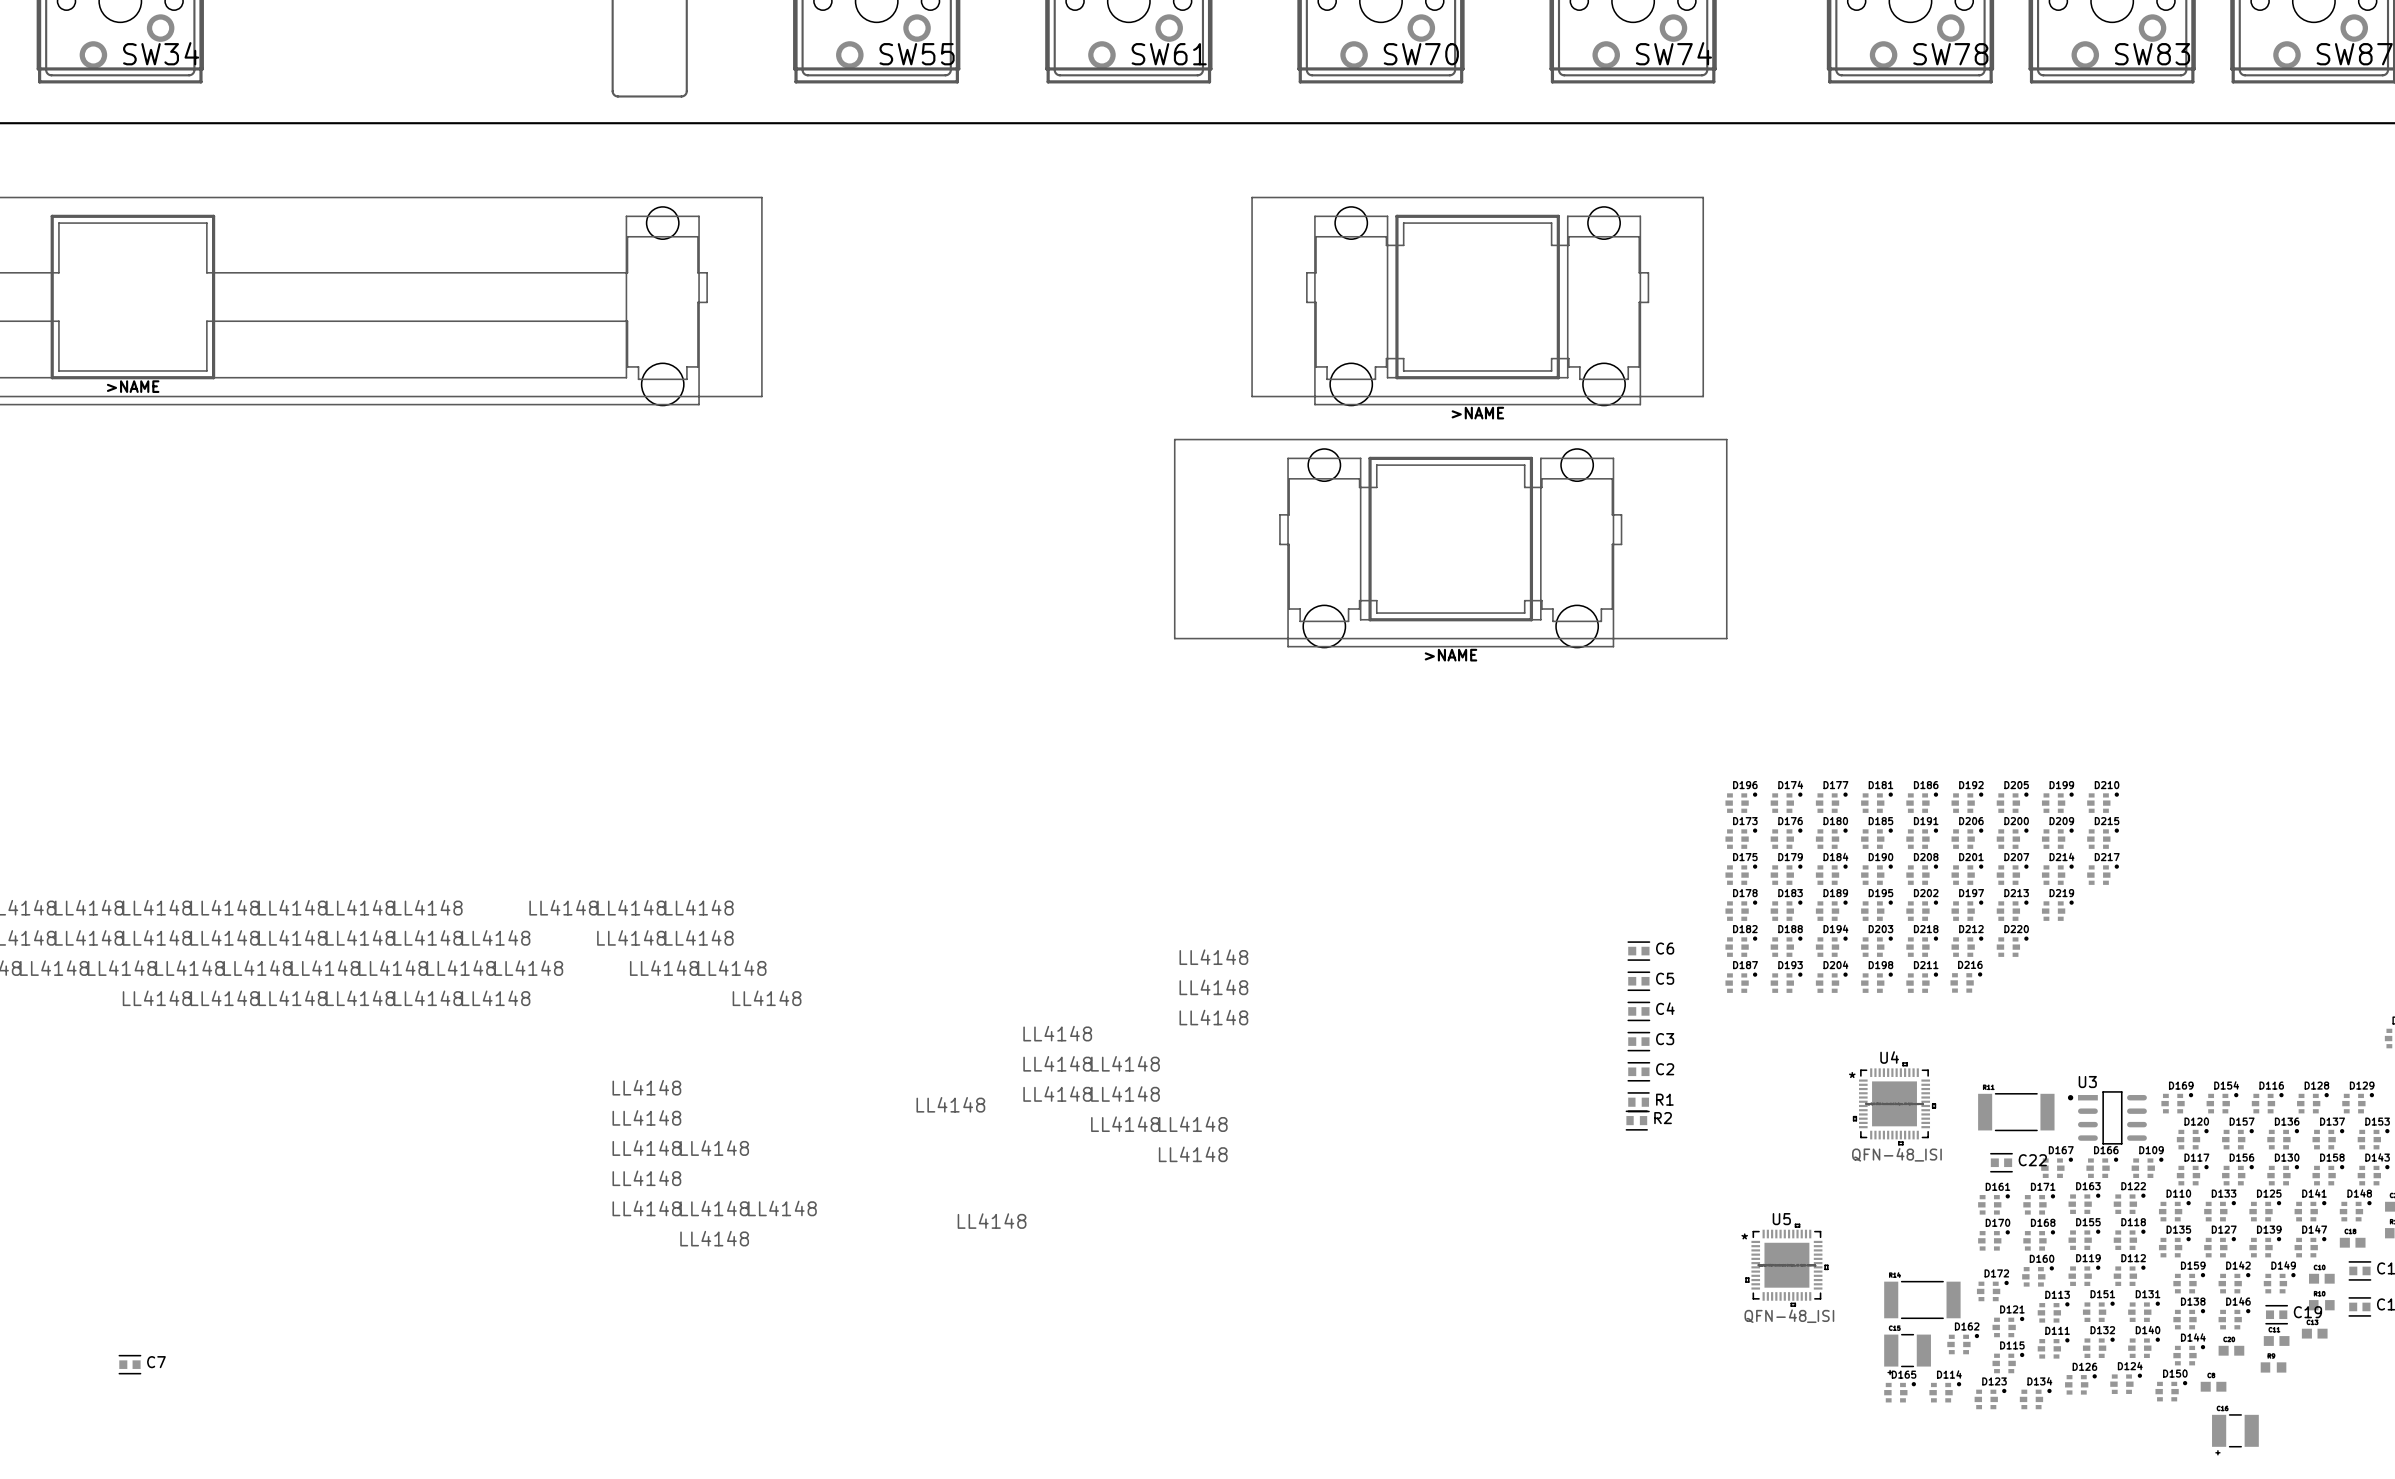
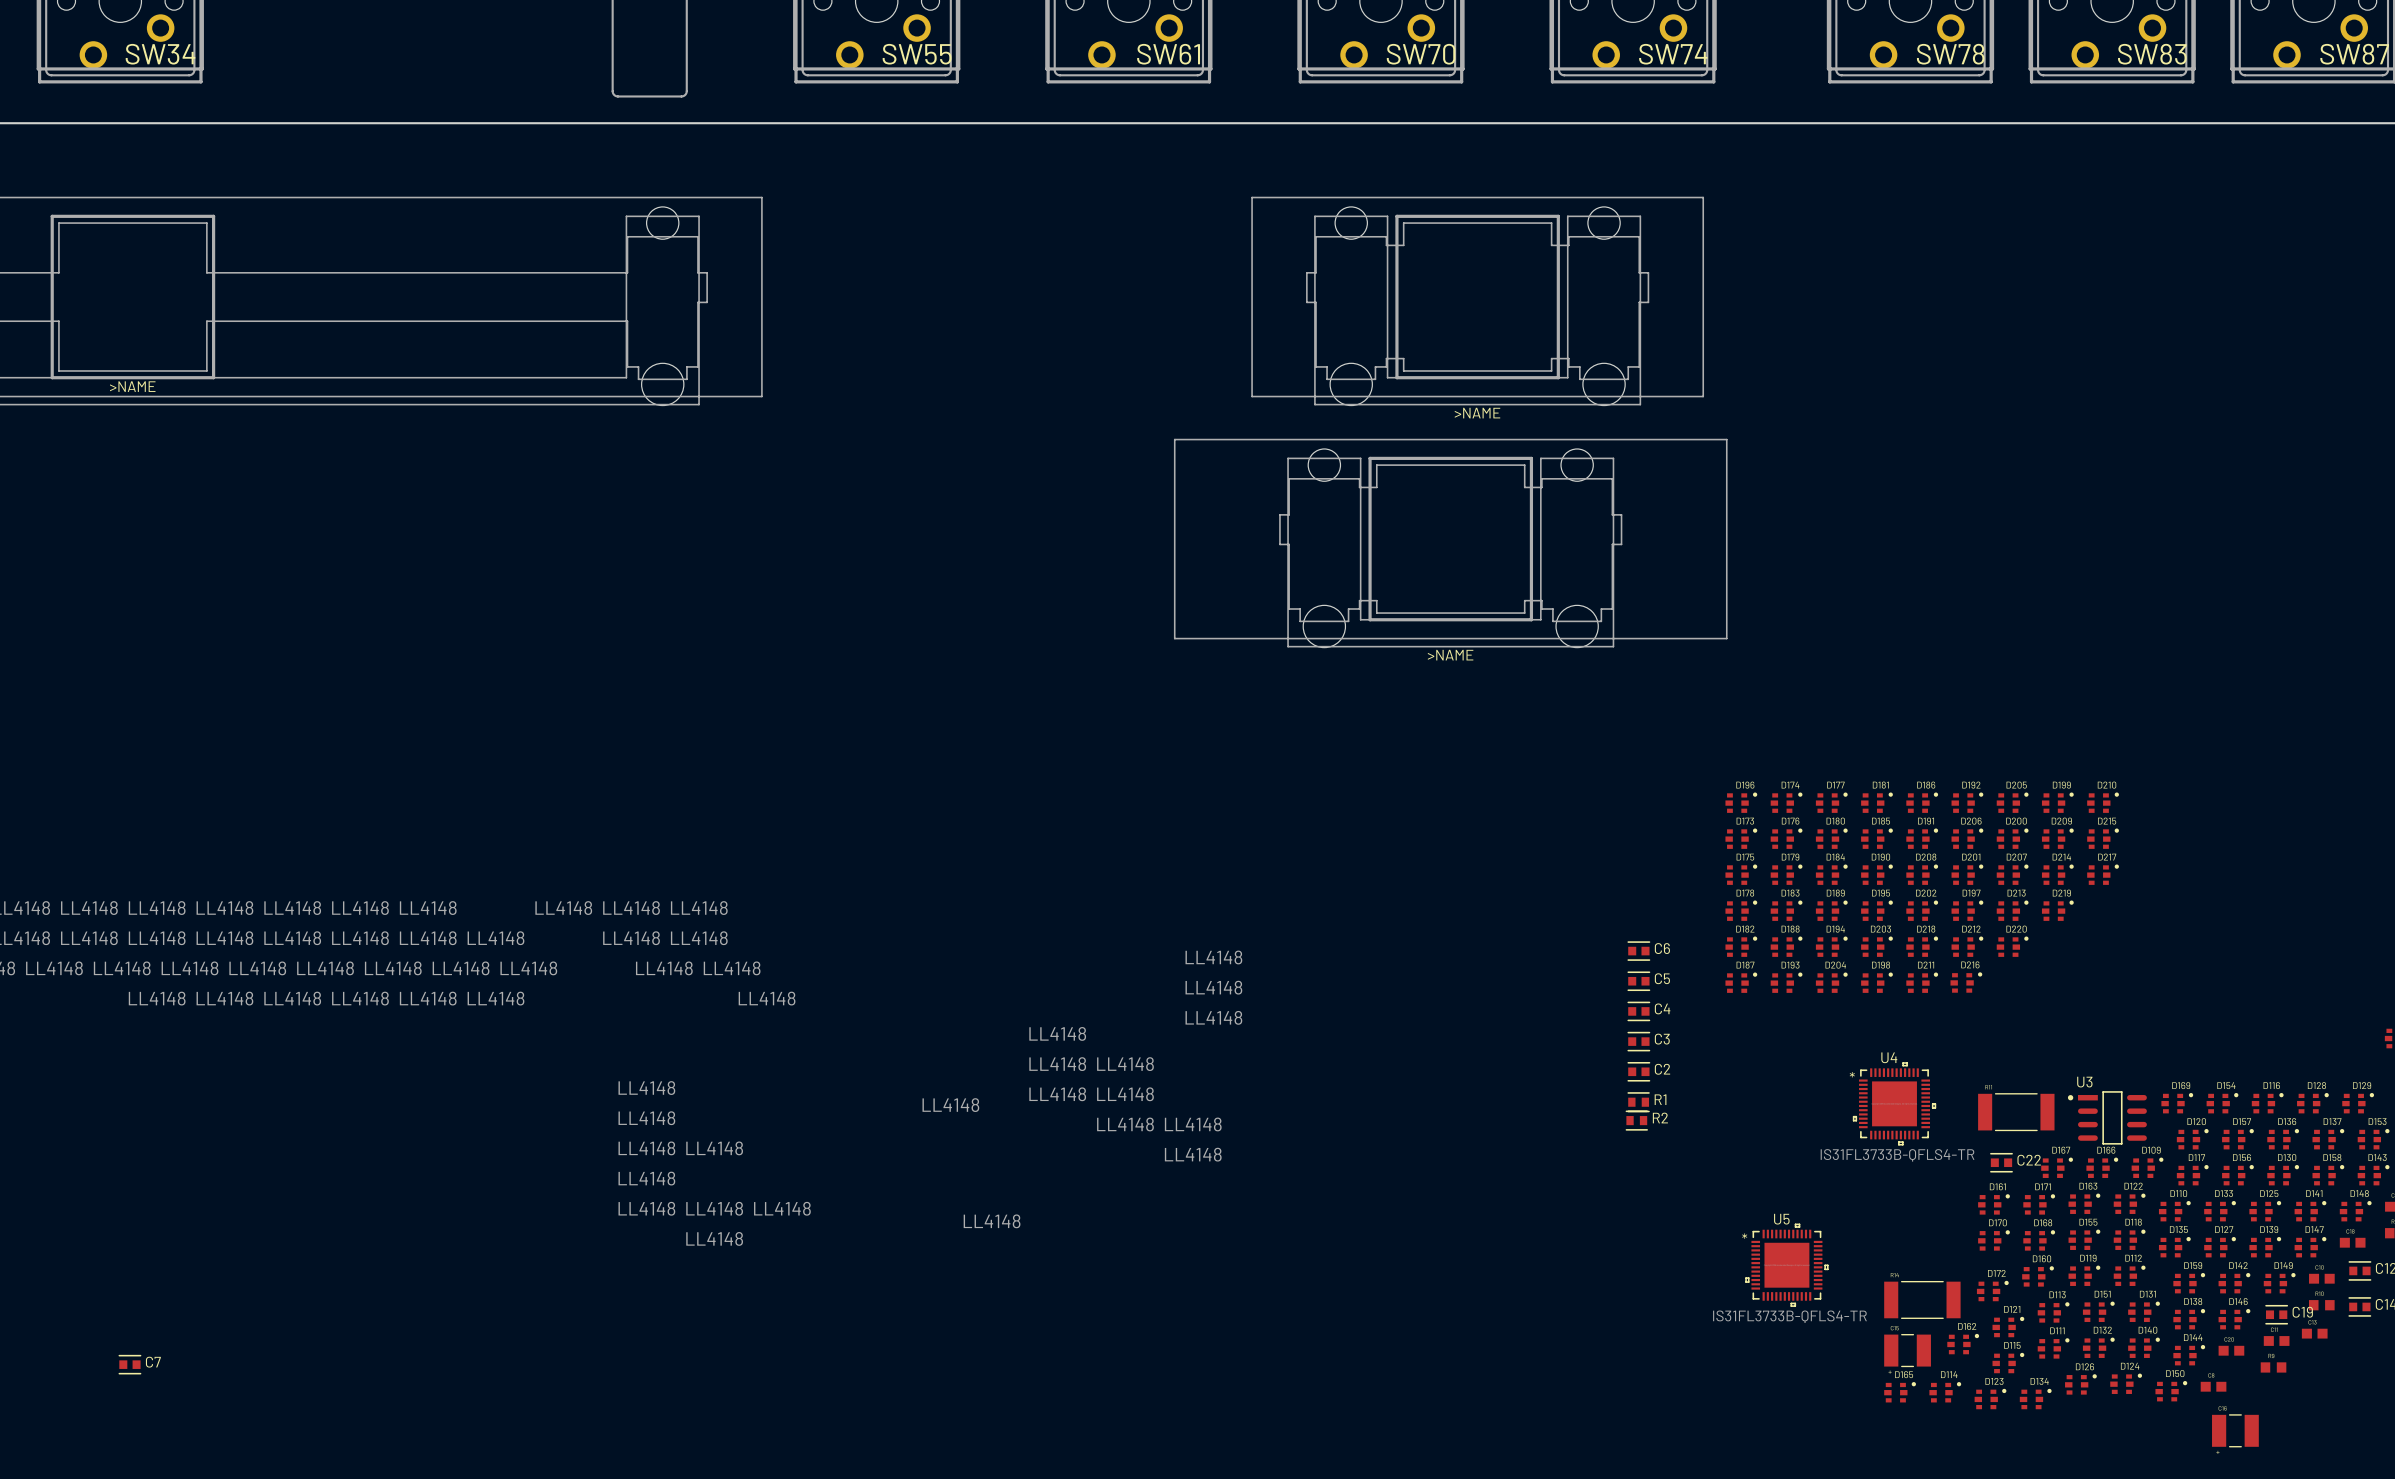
U4 value: QFN-48_ISI (1896, 1154) -> IS31FL3733B-QFLS4-TR (1897, 1155)
U5 value: QFN-48_ISI (1789, 1316) -> IS31FL3733B-QFLS4-TR (1789, 1316)

